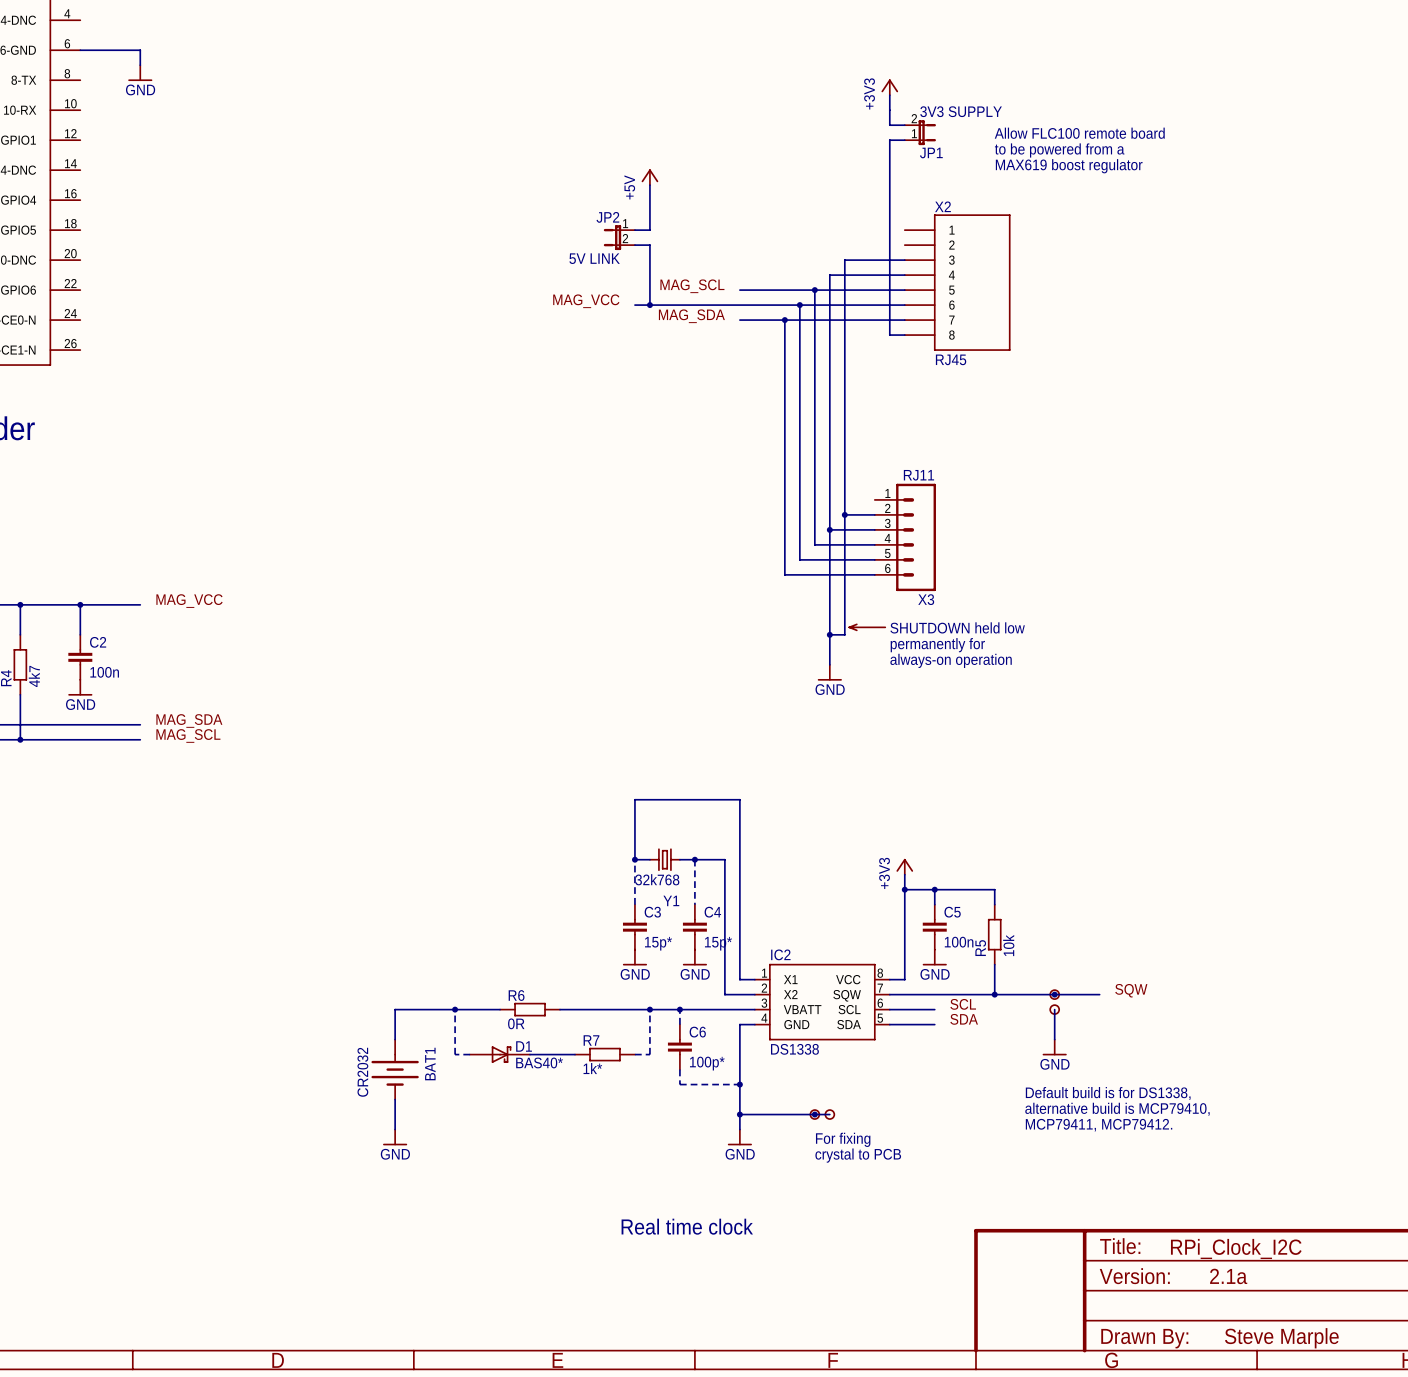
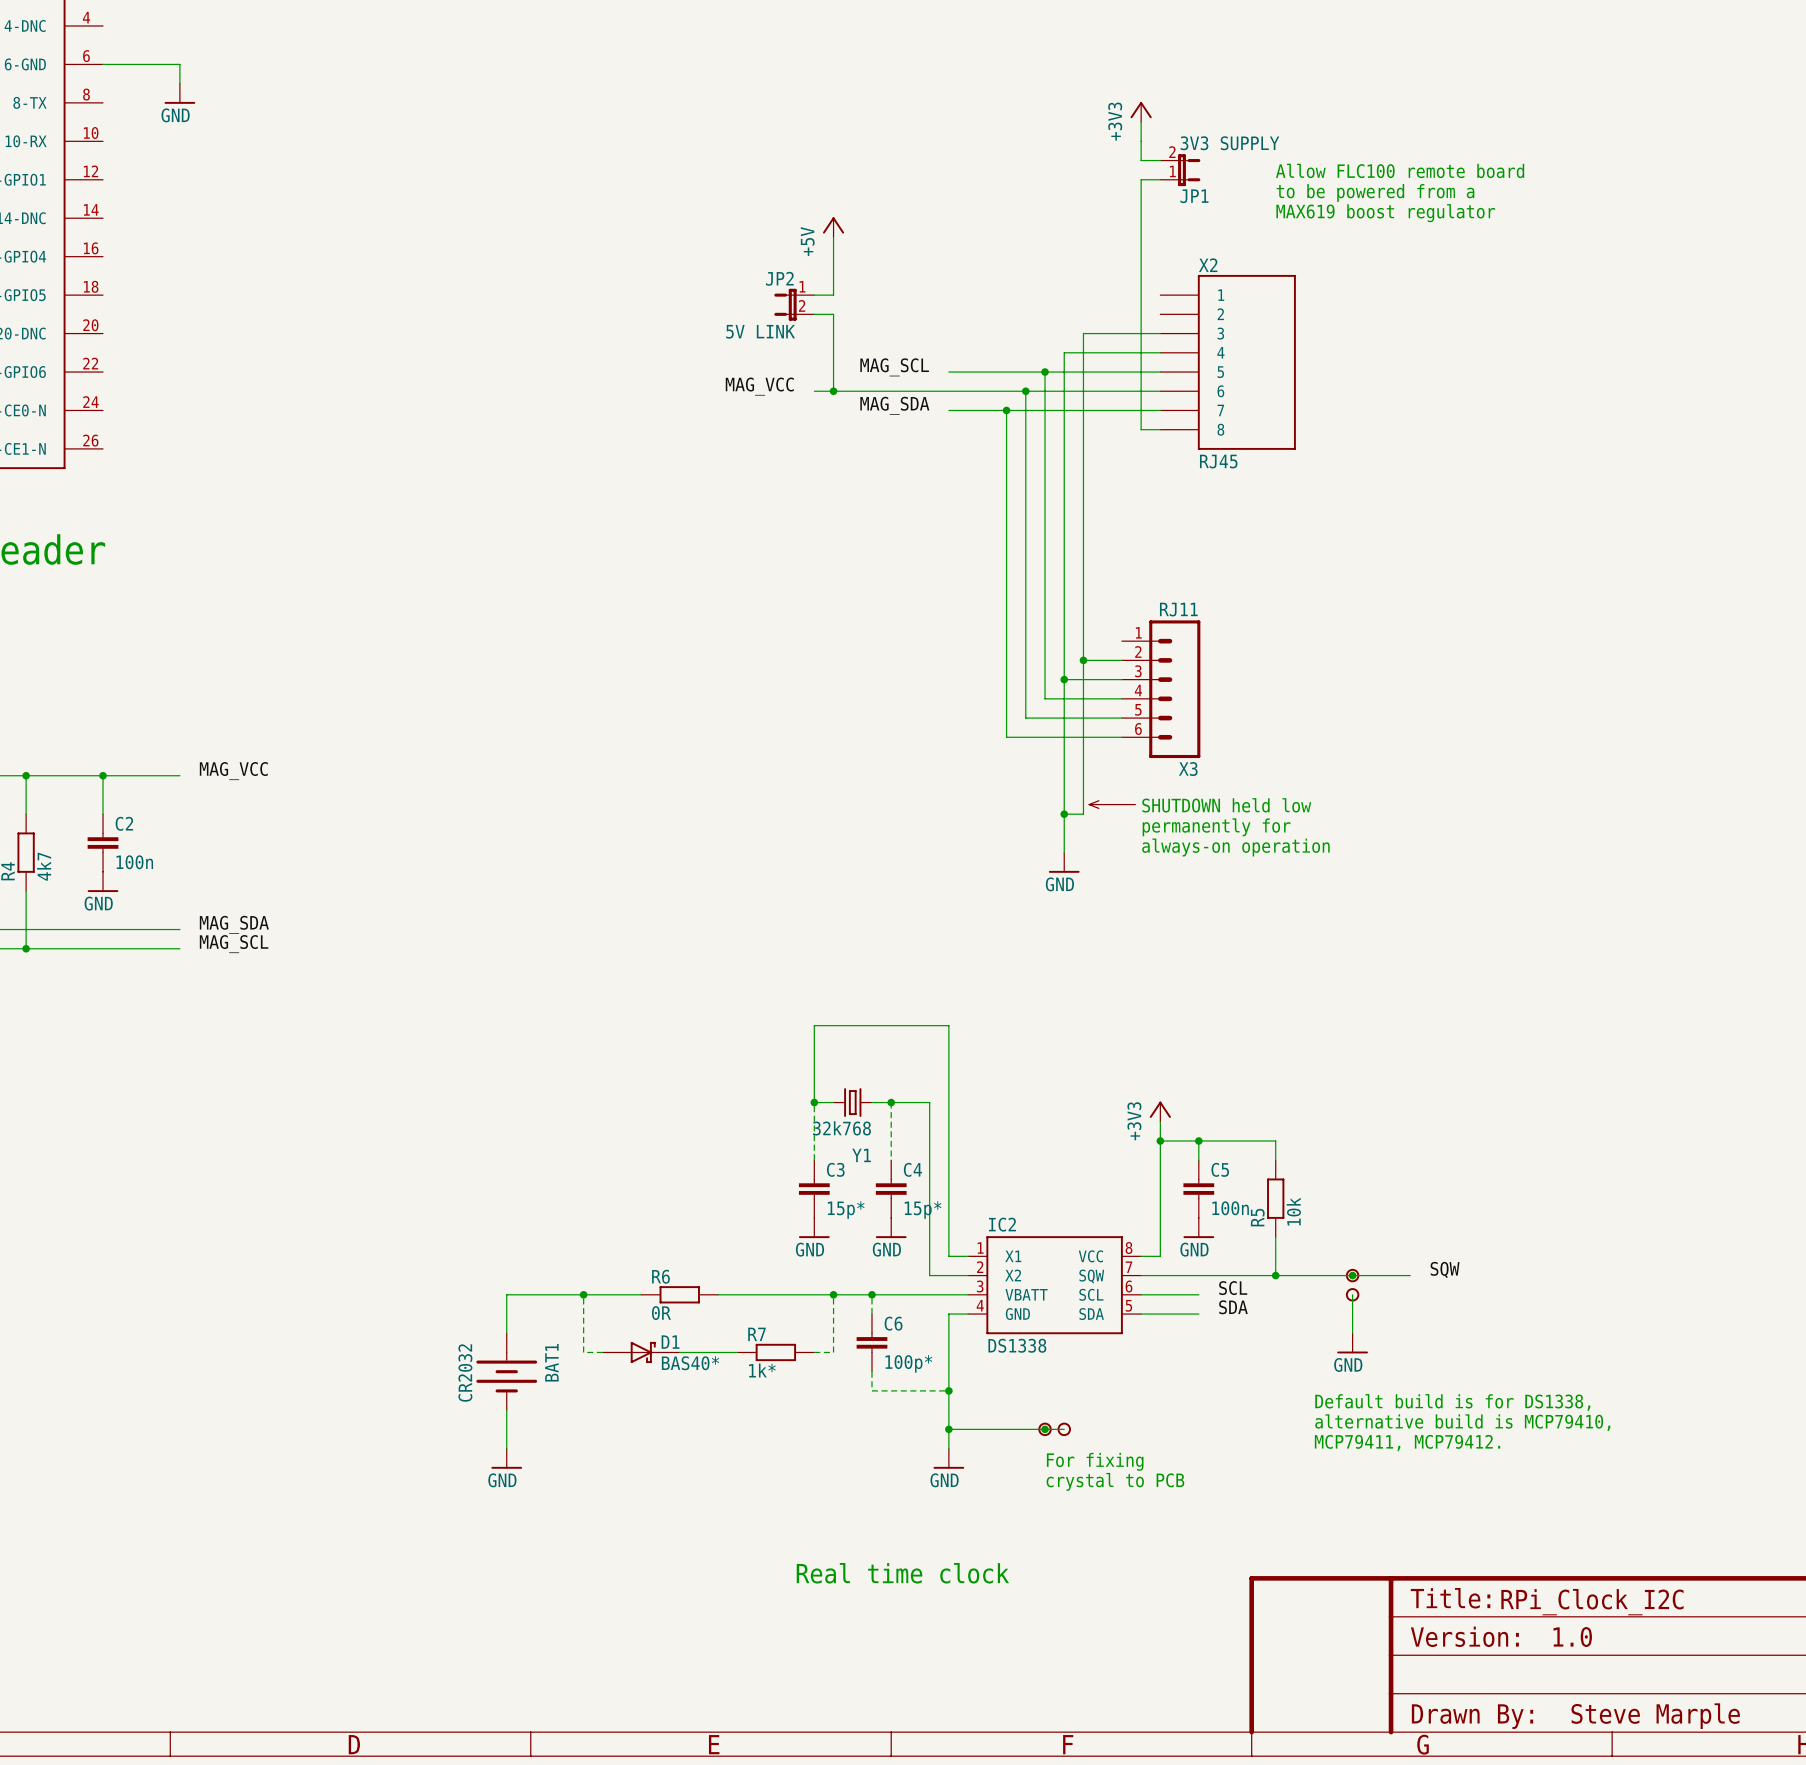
text: 2.1a (1228, 1276) -> 1.0 (1572, 1637)

